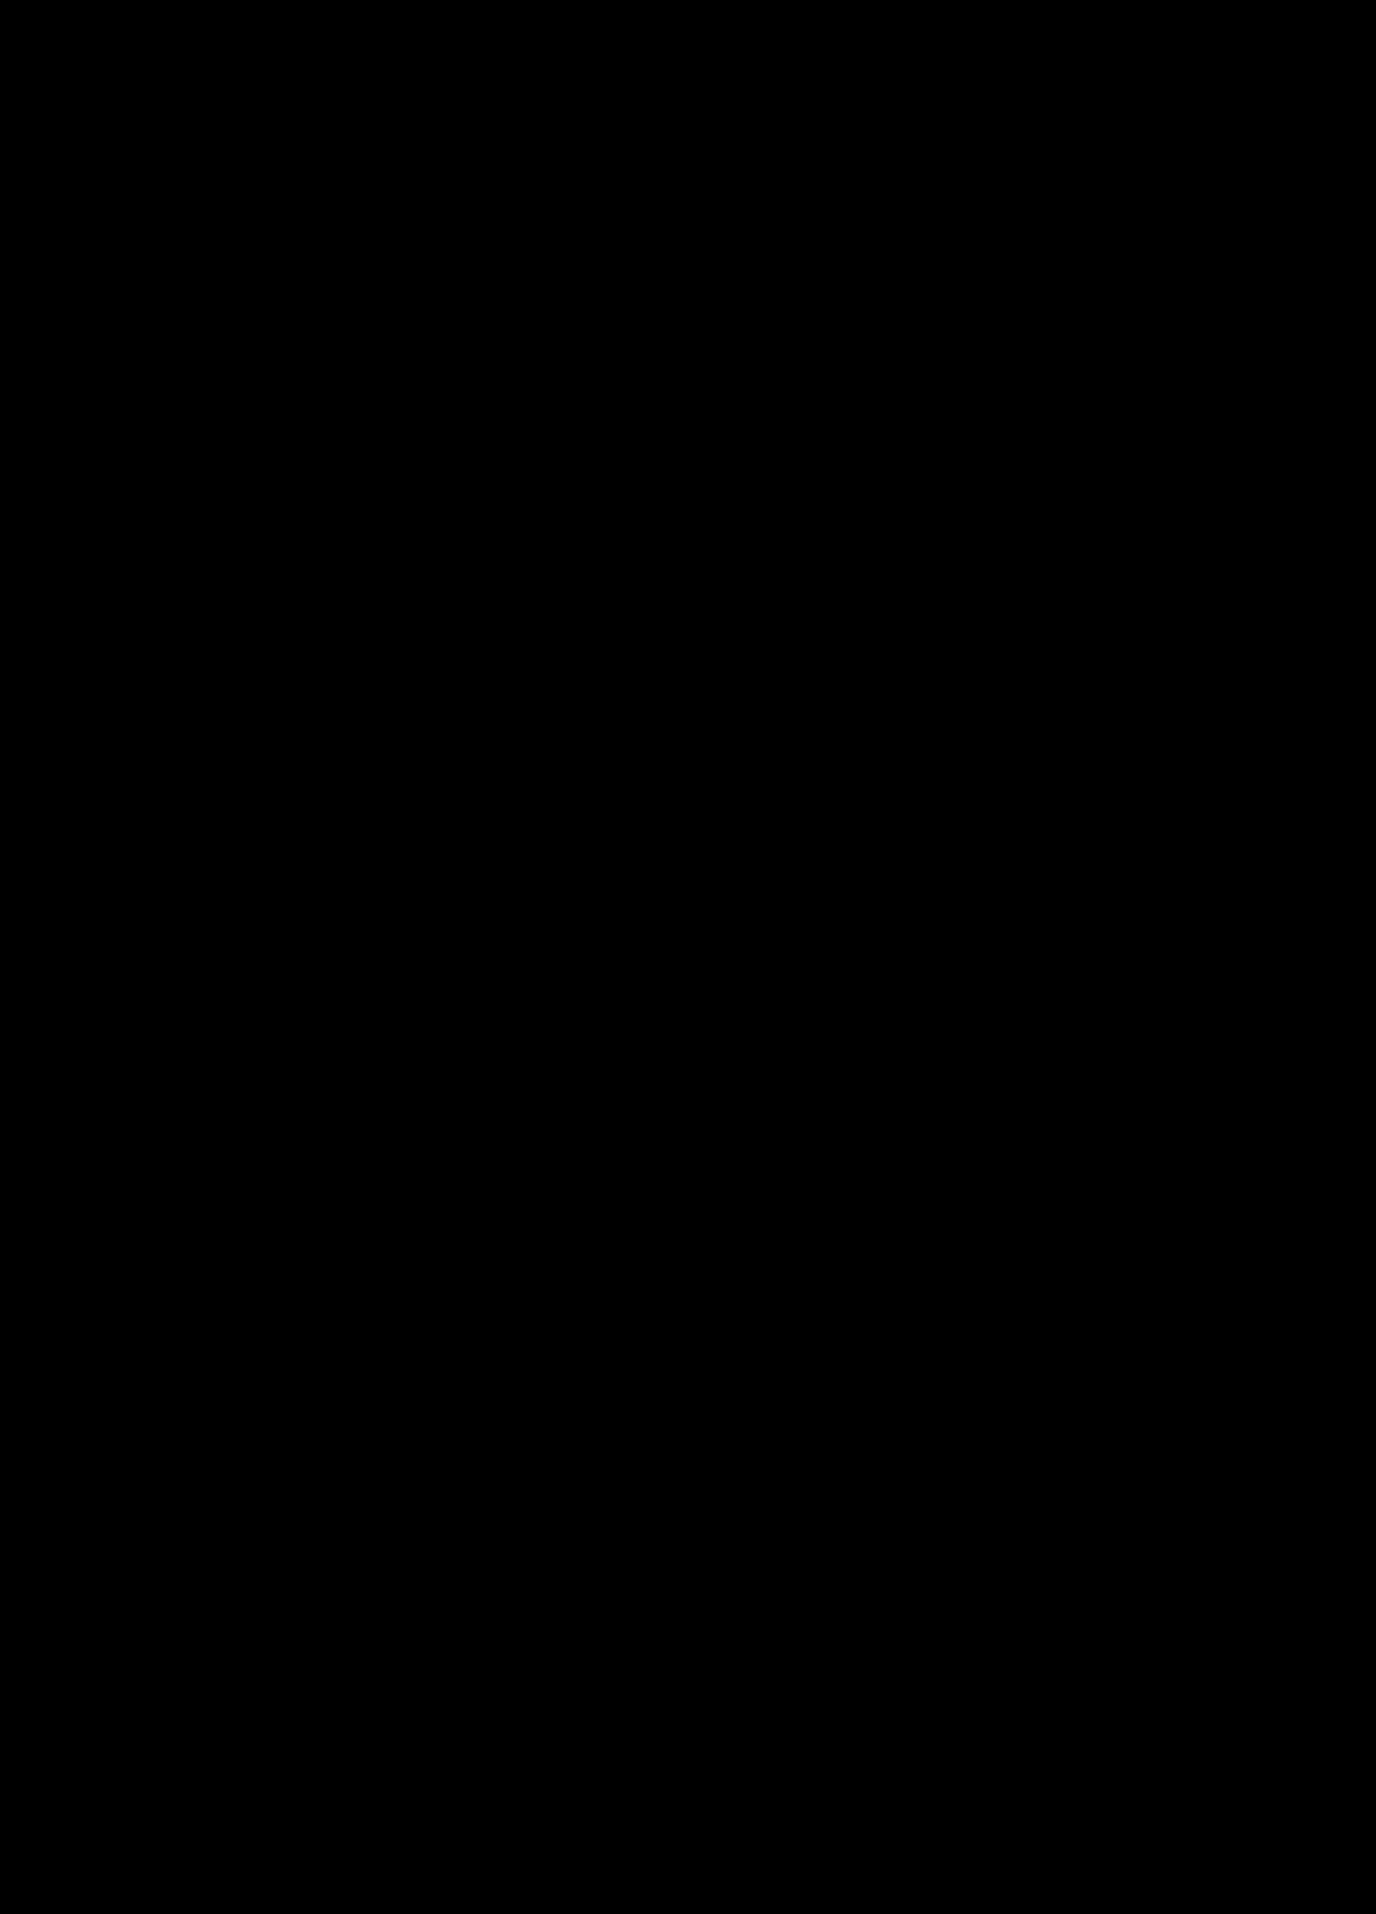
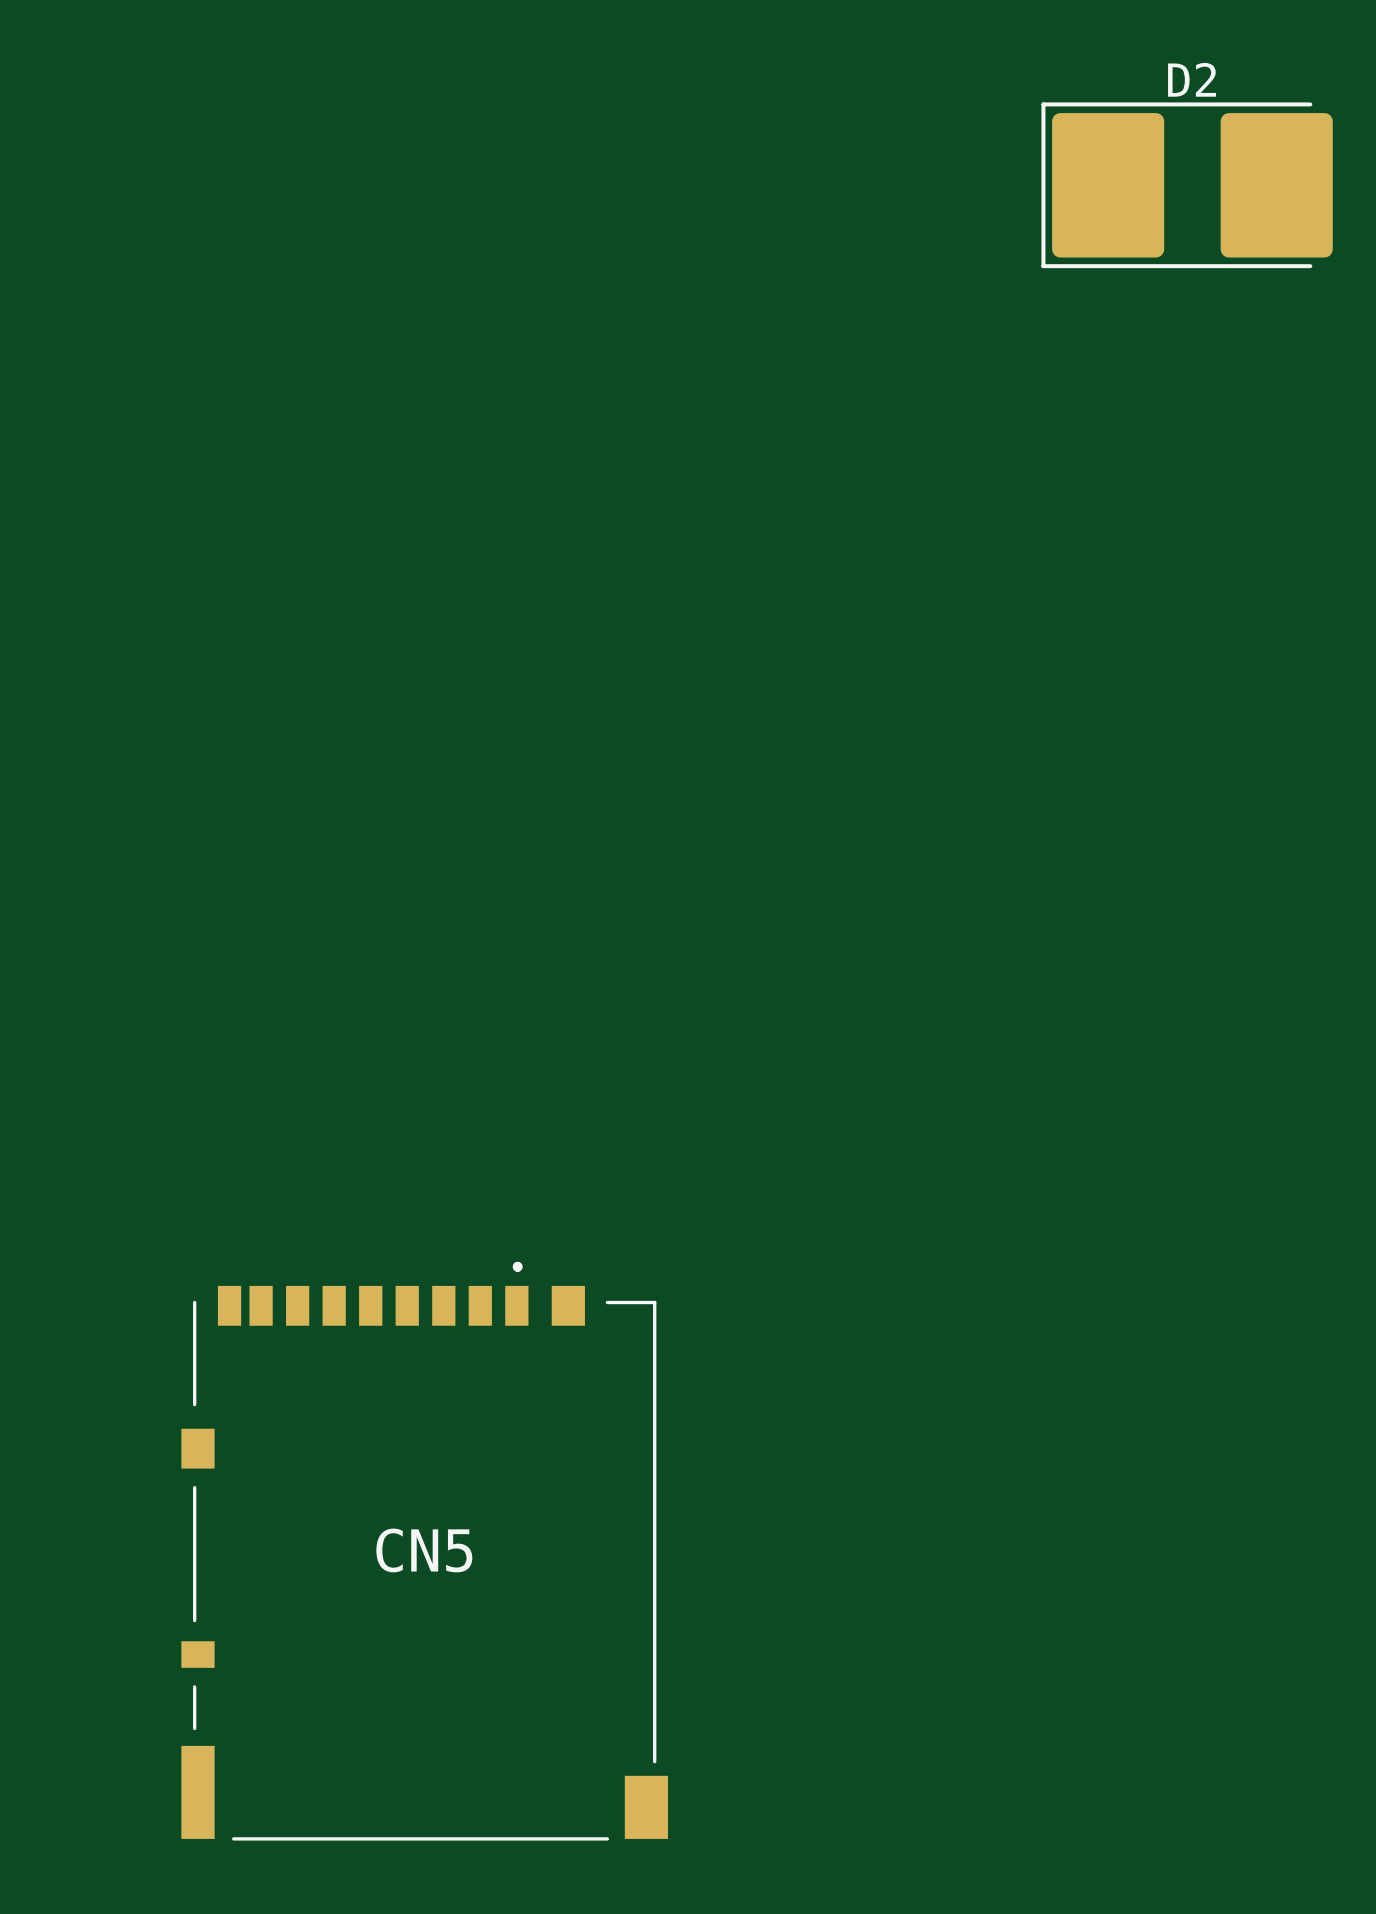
D2: none -> (1187, 185)
CN5: none -> (424, 1551)

